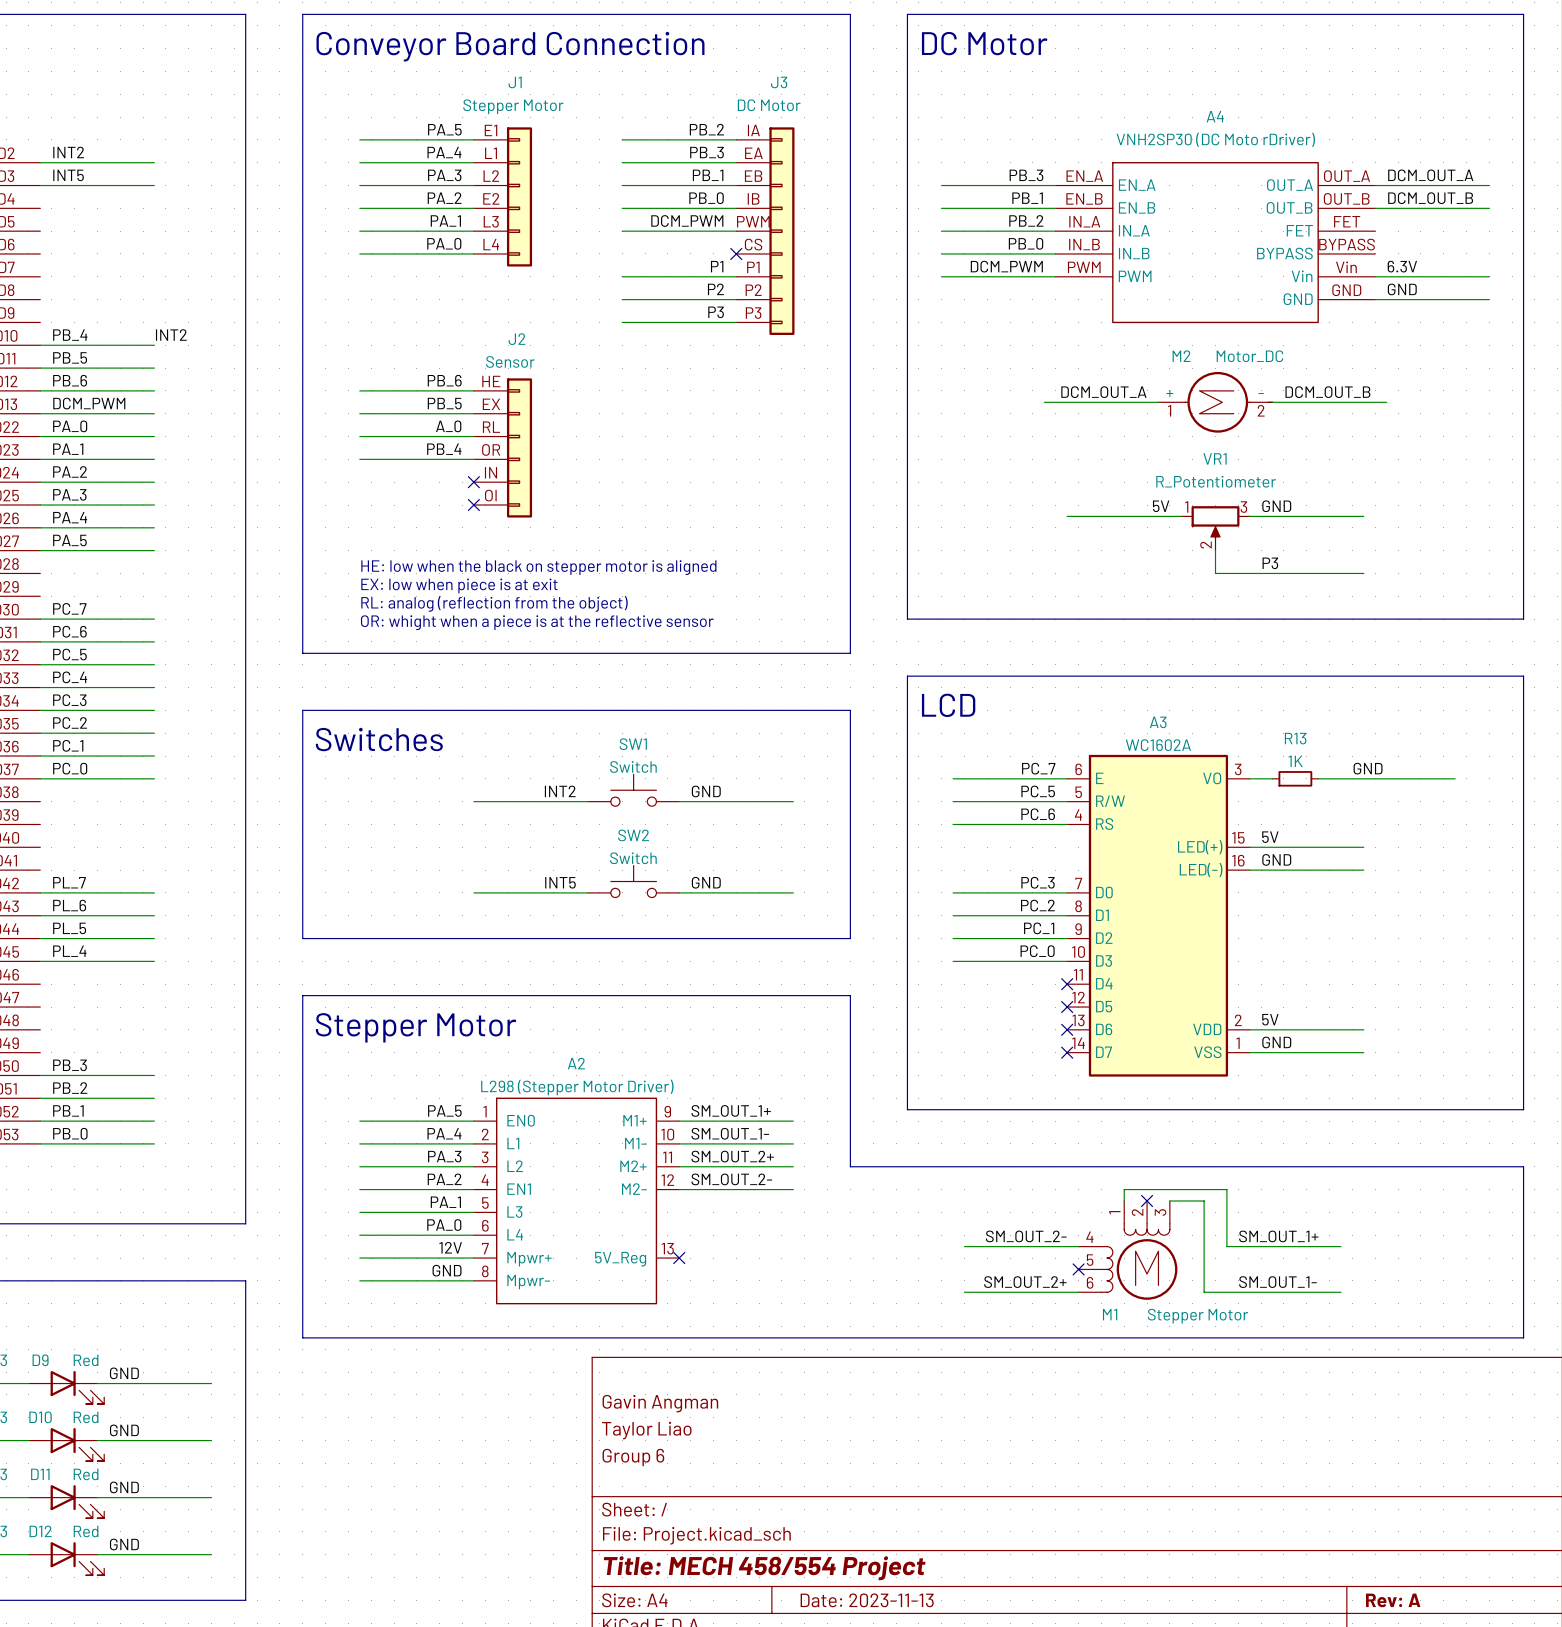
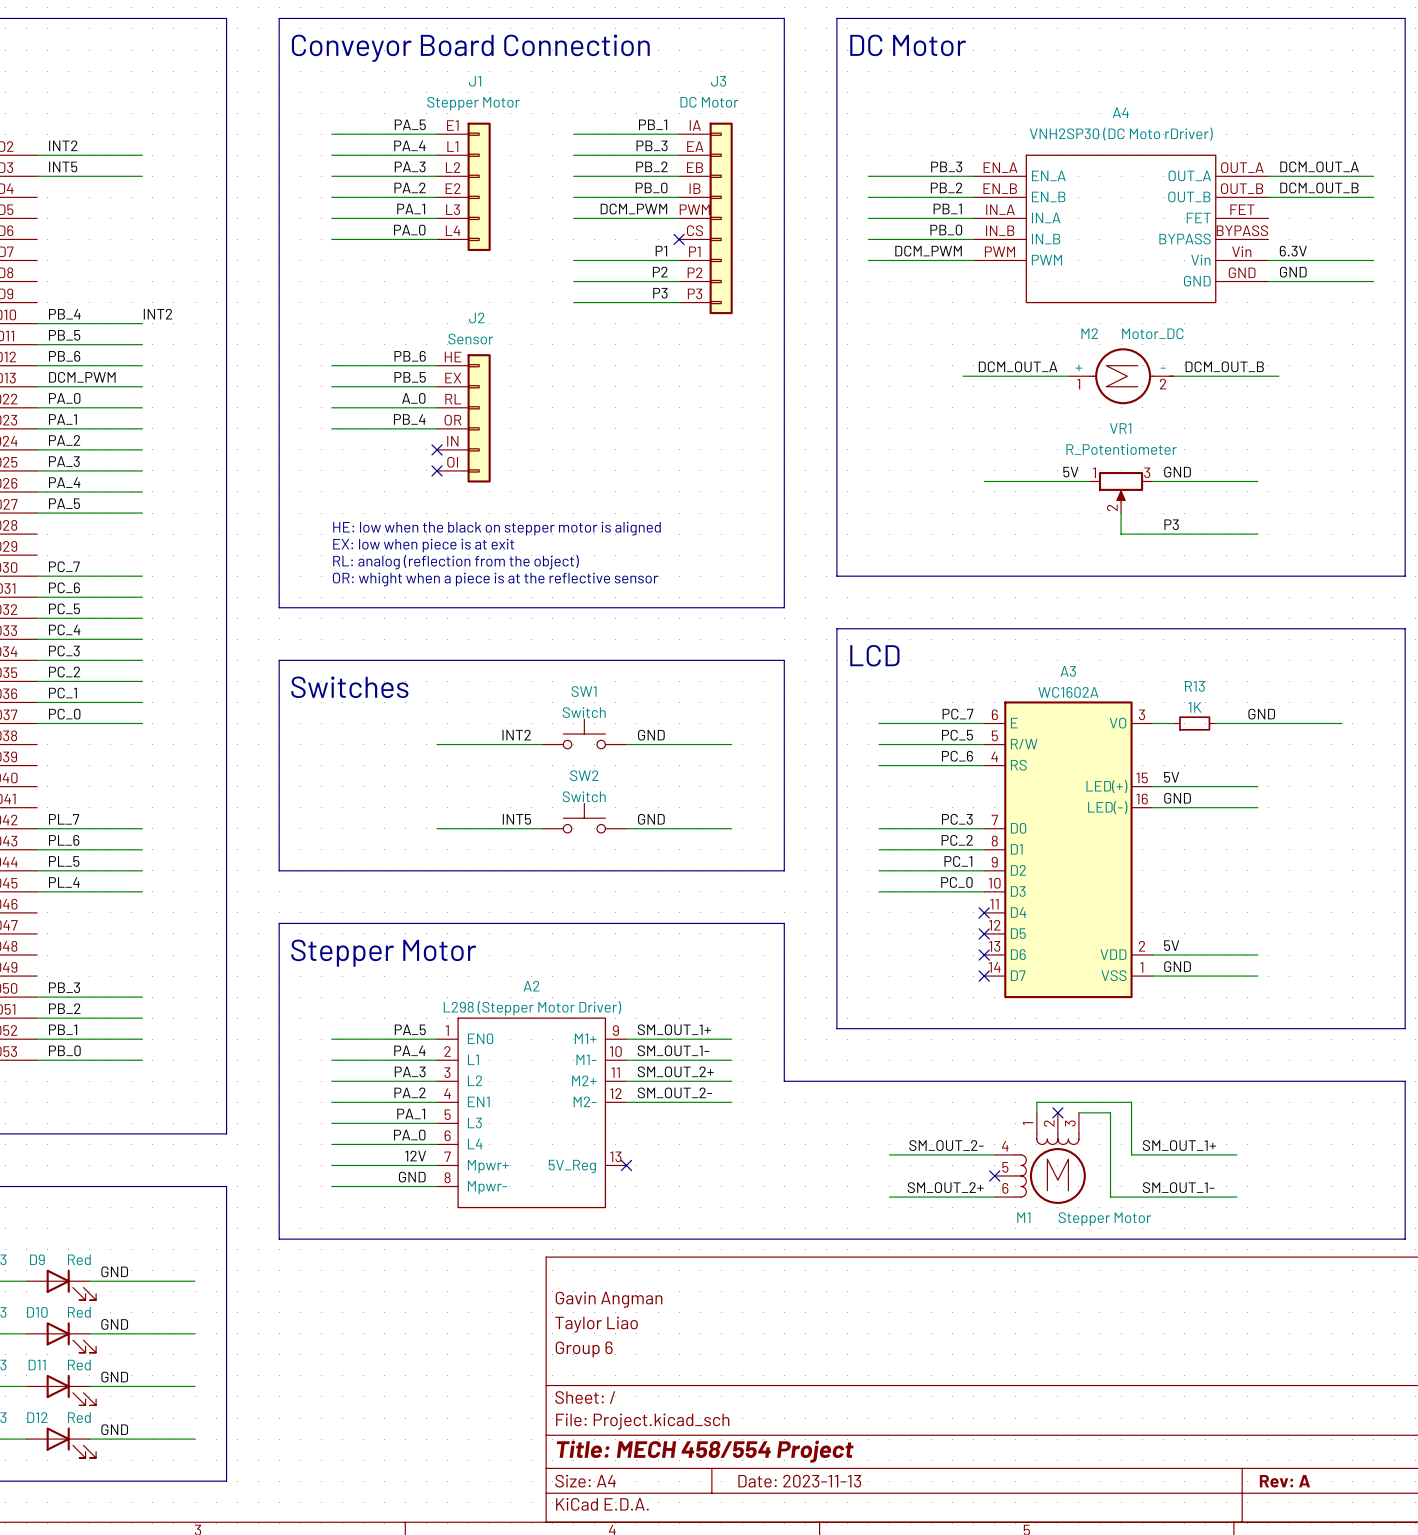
label: PB_2 (706, 129) -> PB_1 (653, 124)
label: PB_1 (708, 175) -> PB_2 (651, 166)
label: PB_1 (1027, 198) -> PB_2 (946, 187)
label: PB_2 (1026, 220) -> PB_1 (947, 208)

